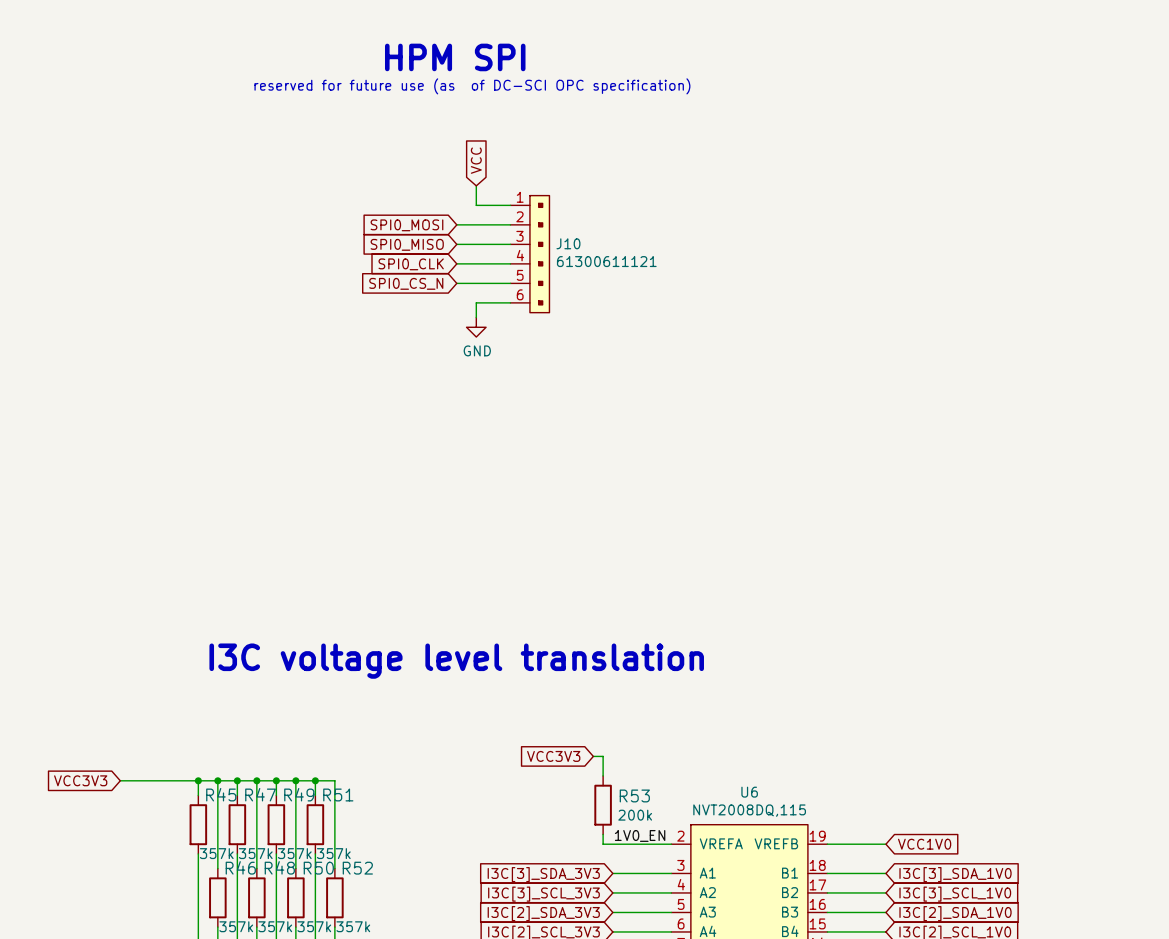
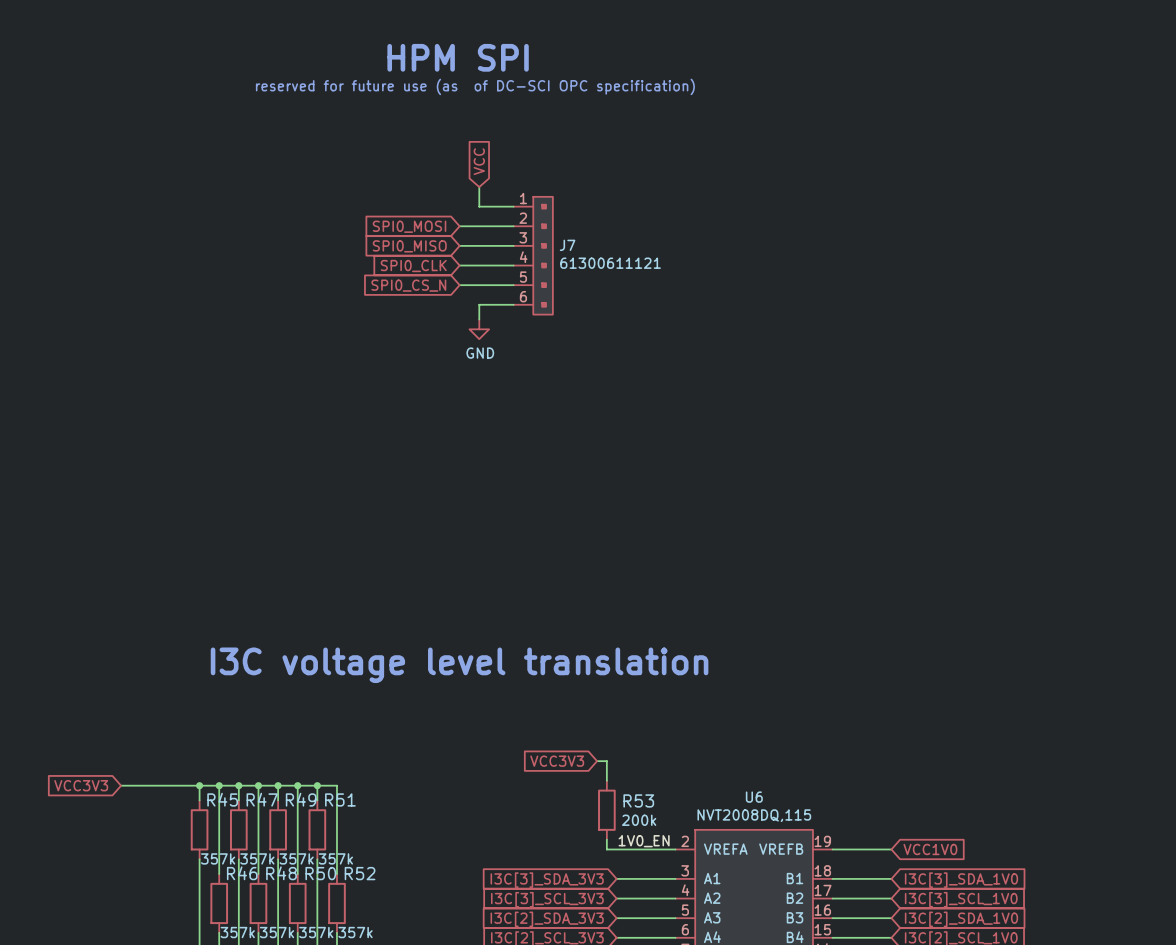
J10 name: J10 (568, 243) -> J7 (567, 245)

